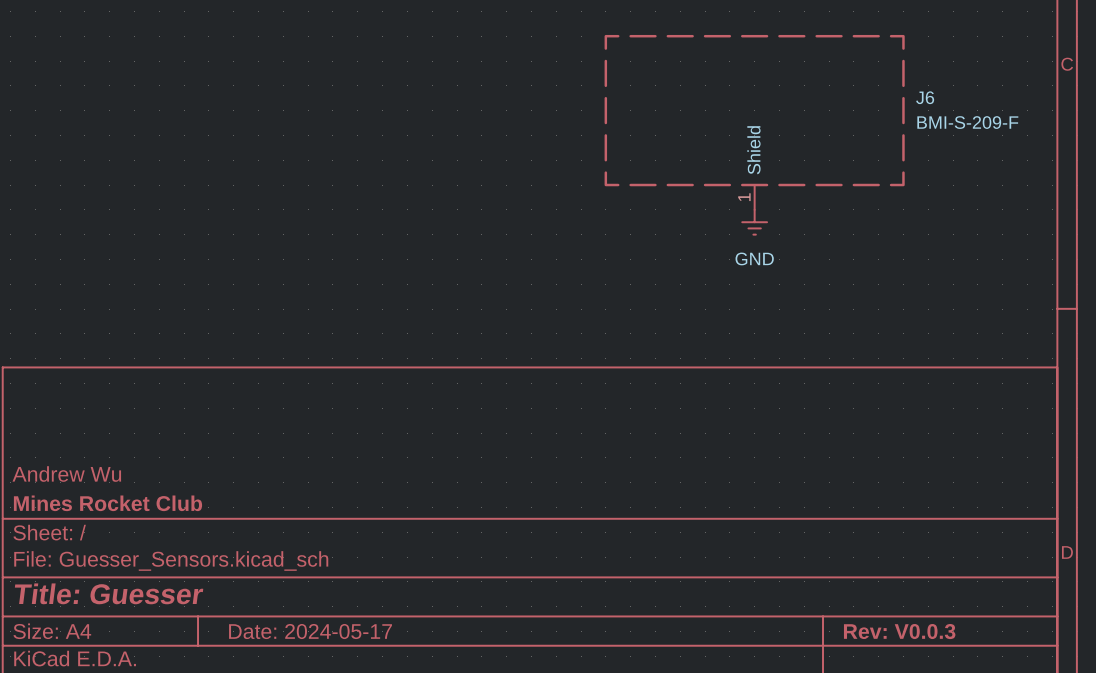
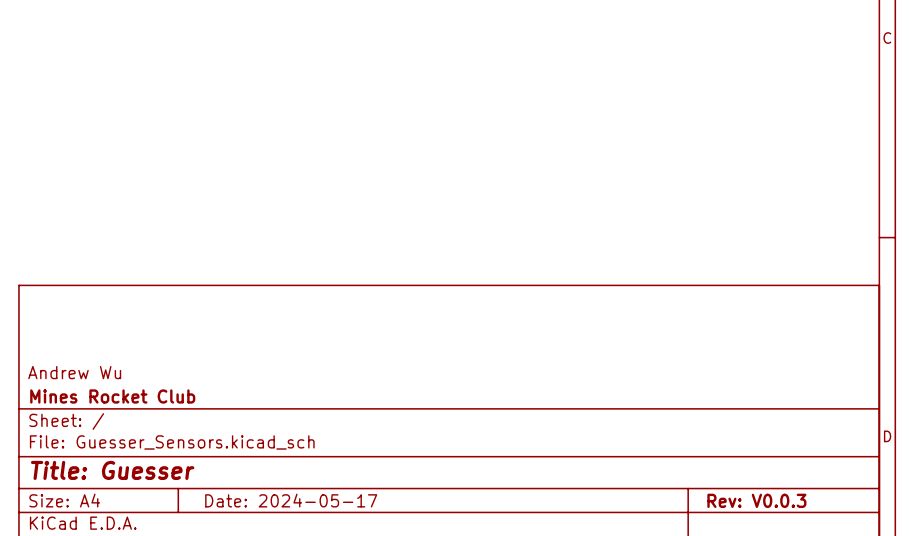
J6: BMI-S-209-F (754, 122) -> none
power symbol: GND (754, 222) -> none

